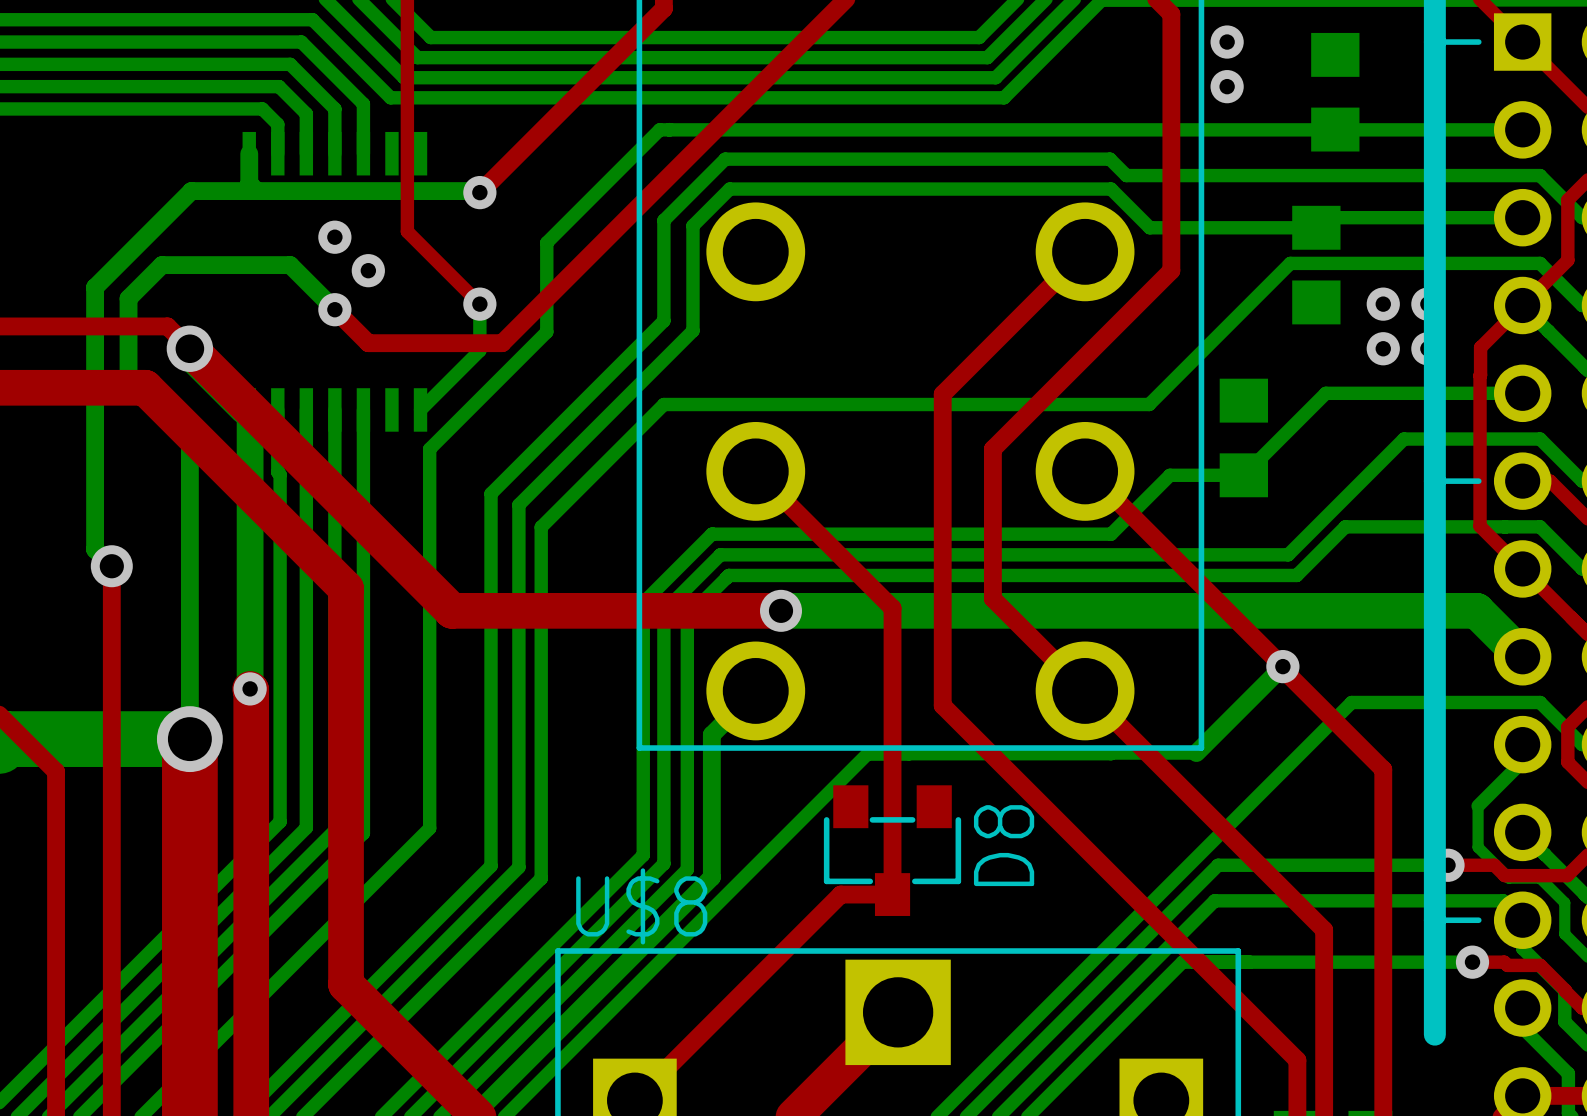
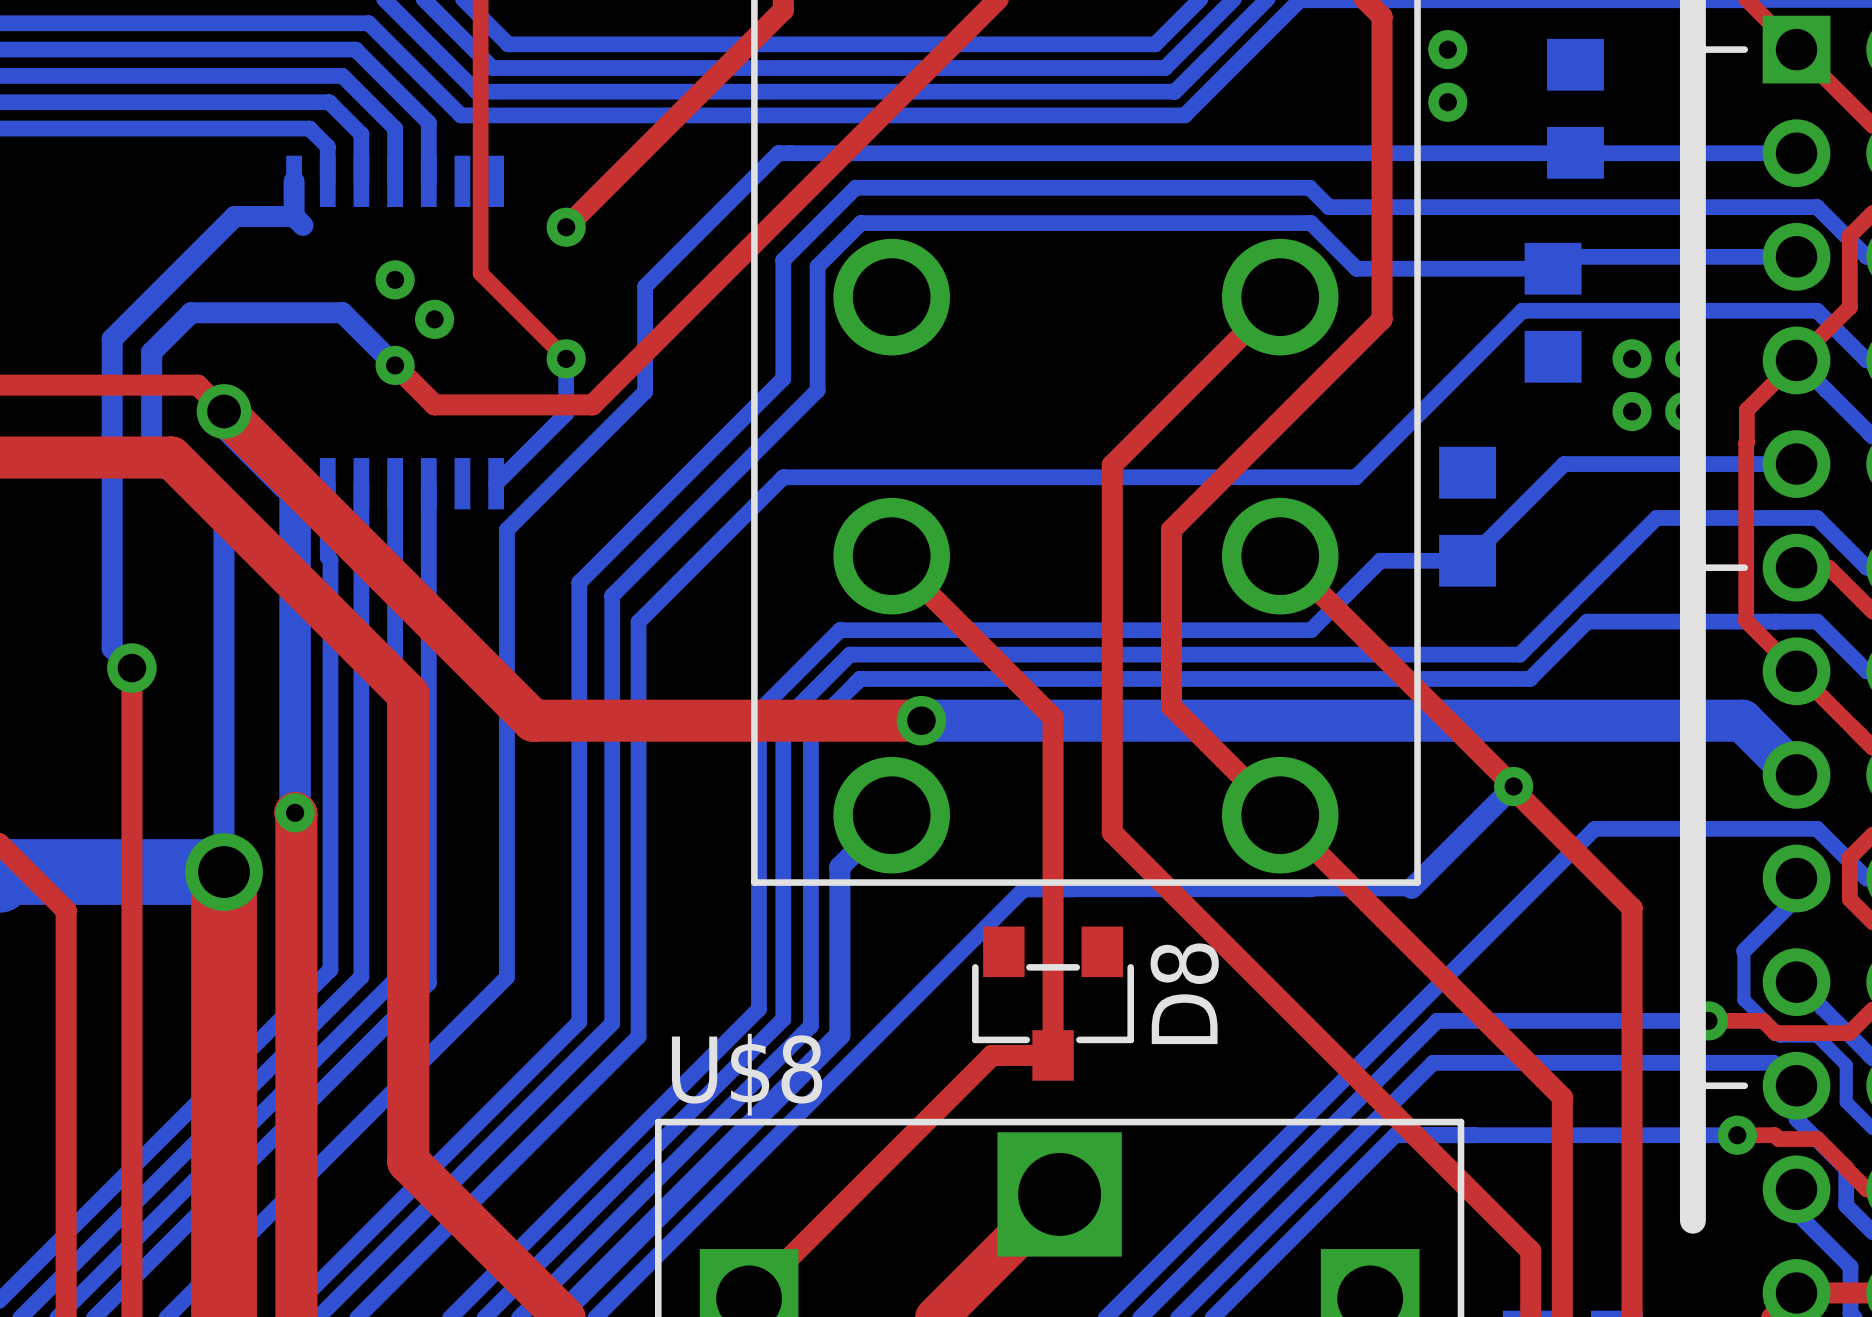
bottom track: (191, 191) (478, 191) -> (225, 225) (234, 216) (294, 216)

